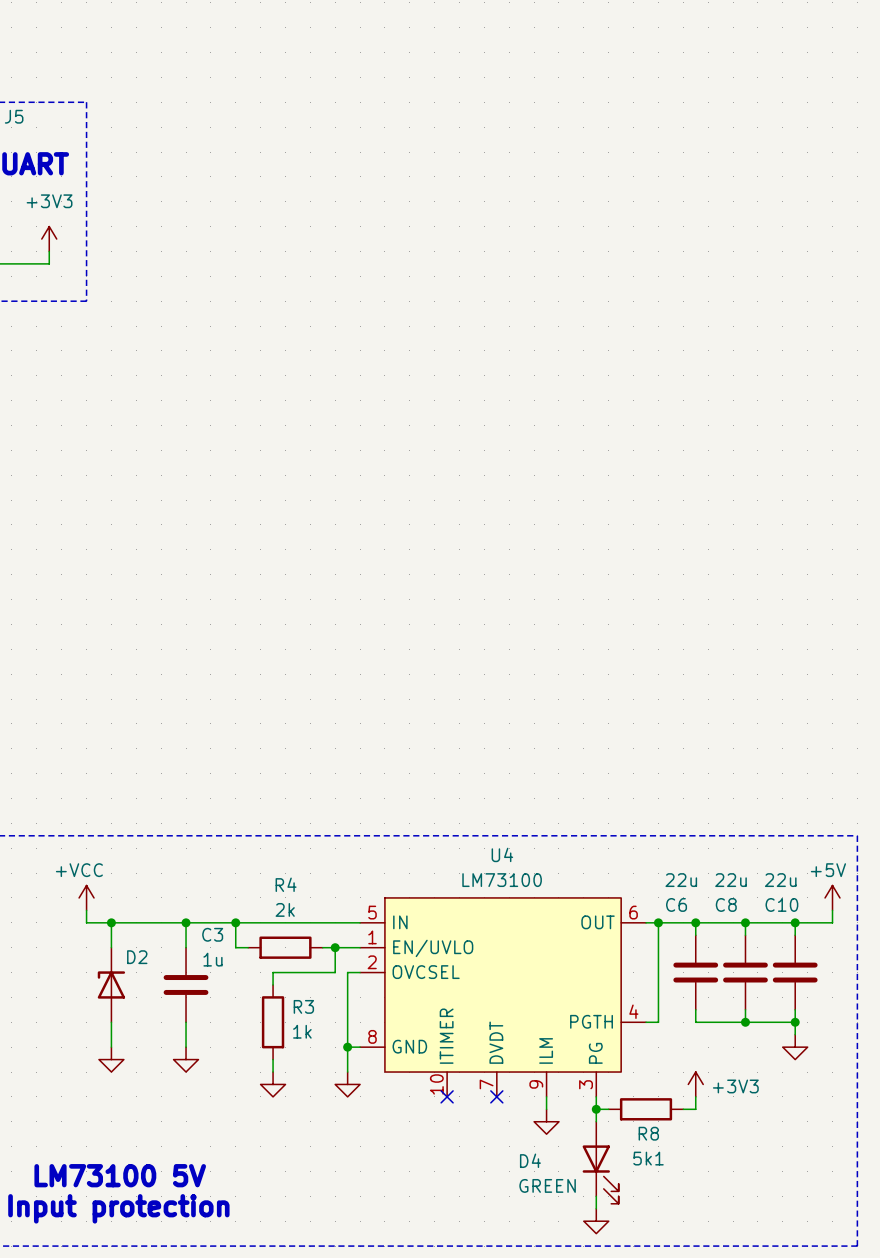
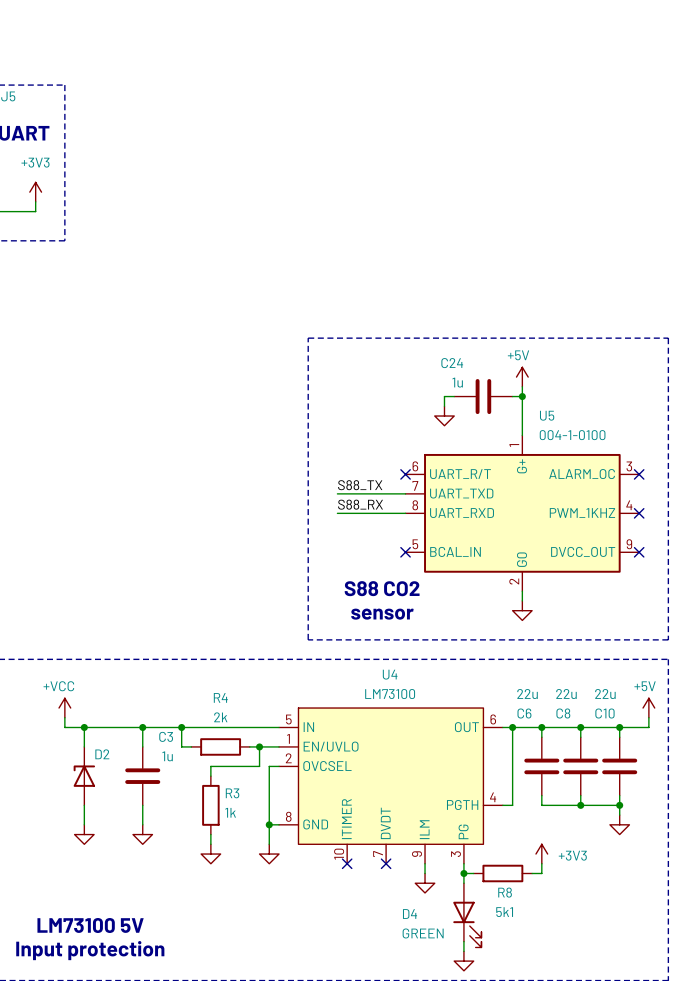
line: none -> (308, 338) (668, 338) (668, 639) (308, 639) (308, 338)
power symbol: none -> +5V (522, 377)
wire: none -> (522, 386) (522, 435)
wire: none -> (454, 396) (444, 396) (444, 406)
C24: none -> 1u (483, 396)
wire: none -> (512, 396) (522, 396)
junction: none -> (522, 396)
power symbol: none -> (444, 416)
no-connect mark: none -> (405, 474)
no-connect mark: none -> (639, 474)
label: none -> S88_TX (360, 485)
wire: none -> (337, 493) (405, 493)
label: none -> S88_RX (360, 504)
wire: none -> (337, 513) (405, 513)
U5: none -> 004-1-0100 (522, 513)
no-connect mark: none -> (639, 513)
no-connect mark: none -> (405, 552)
no-connect mark: none -> (639, 552)
text: none -> S88 CO2 (382, 588)
wire: none -> (522, 591) (522, 600)
power symbol: none -> (522, 610)
text: none -> sensor (382, 614)

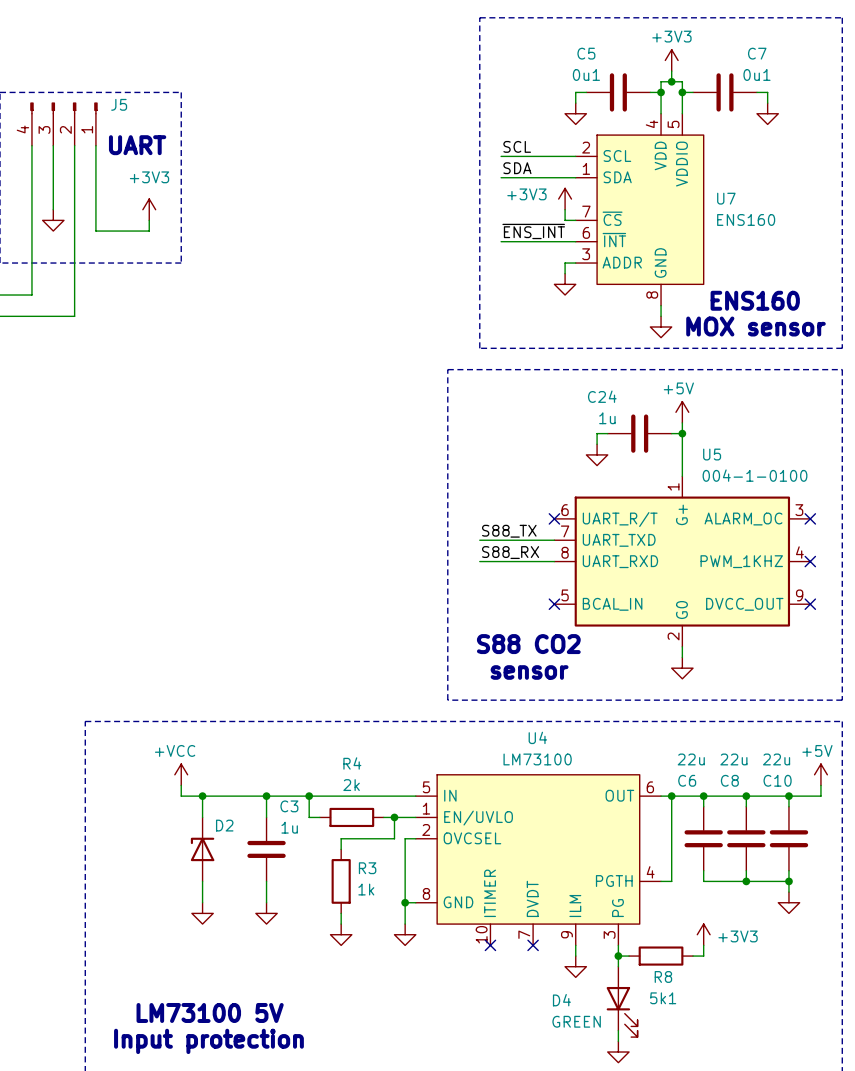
line: none -> (479, 17) (842, 17) (842, 348) (479, 348) (479, 17)
power symbol: none -> +3V3 (671, 60)
wire: none -> (671, 71) (671, 81)
junction: none -> (671, 81)
wire: none -> (586, 92) (575, 92) (575, 103)
C5: none -> 0u1 (618, 92)
wire: none -> (650, 92) (661, 92)
junction: none -> (661, 92)
wire: none -> (682, 92) (693, 92)
junction: none -> (682, 92)
C7: none -> 0u1 (725, 92)
wire: none -> (756, 92) (767, 92) (767, 103)
power symbol: none -> (575, 113)
wire: none -> (661, 113) (661, 81) (682, 81) (682, 113)
power symbol: none -> (767, 113)
label: none -> SCL (517, 146)
wire: none -> (501, 156) (575, 156)
label: none -> SDA (517, 168)
wire: none -> (501, 177) (575, 177)
power symbol: none -> +3V3 (565, 199)
wire: none -> (565, 209) (565, 220) (575, 220)
U7: none -> ENS160 (639, 209)
label: none -> ~{ENS_INT} (533, 231)
wire: none -> (501, 241) (575, 241)
wire: none -> (575, 263) (565, 263) (565, 273)
power symbol: none -> (565, 284)
text: none -> ENS160 (755, 300)
wire: none -> (661, 305) (661, 316)
text: none -> MOX sensor (756, 326)
power symbol: none -> (661, 326)

